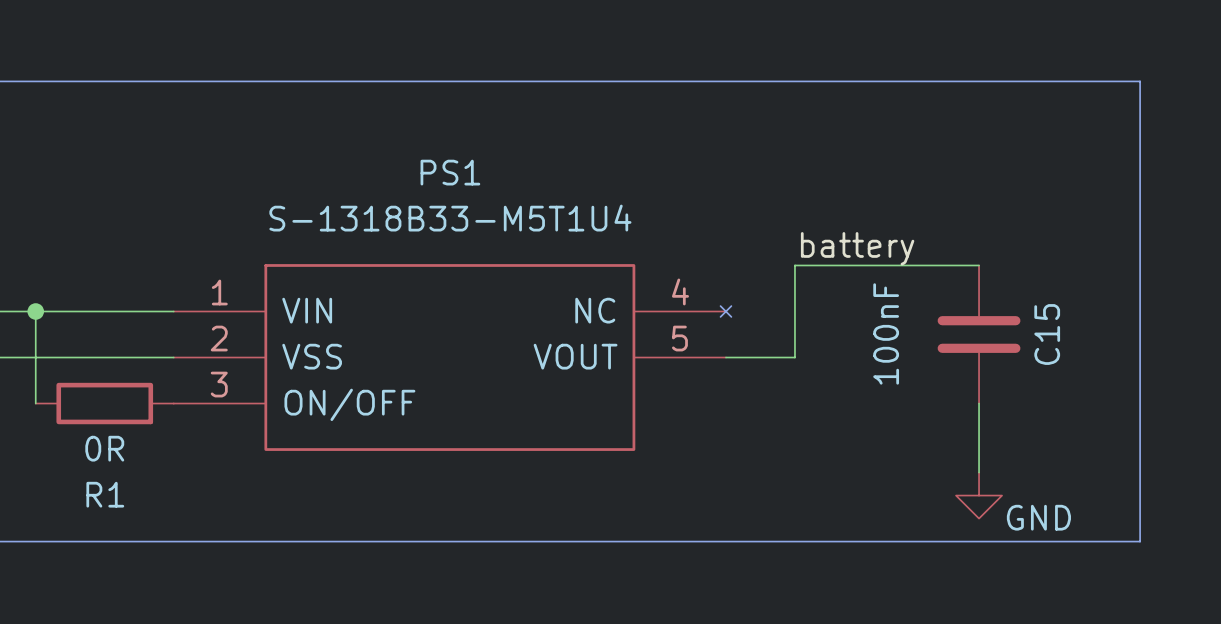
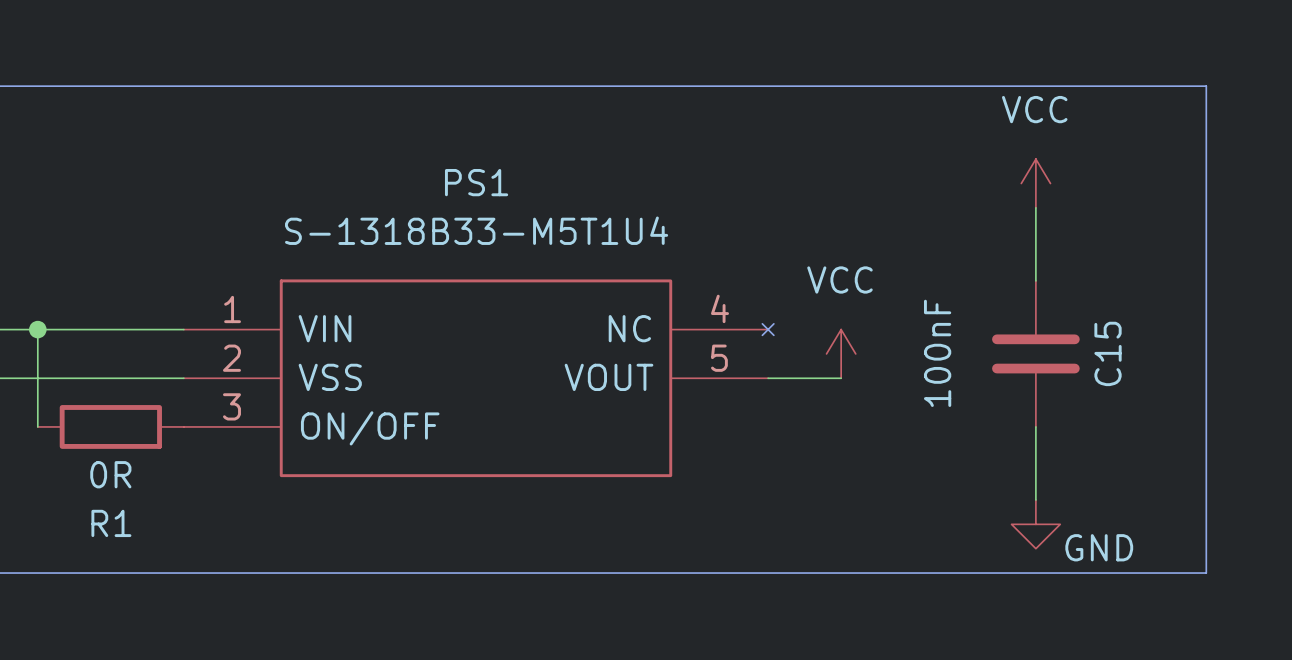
power symbol: none -> VCC (1035, 183)
label: battery (857, 248) -> none
wire: (979, 265) (794, 265) (794, 357) -> (1035, 280) (1035, 207)
power symbol: none -> VCC (841, 353)

